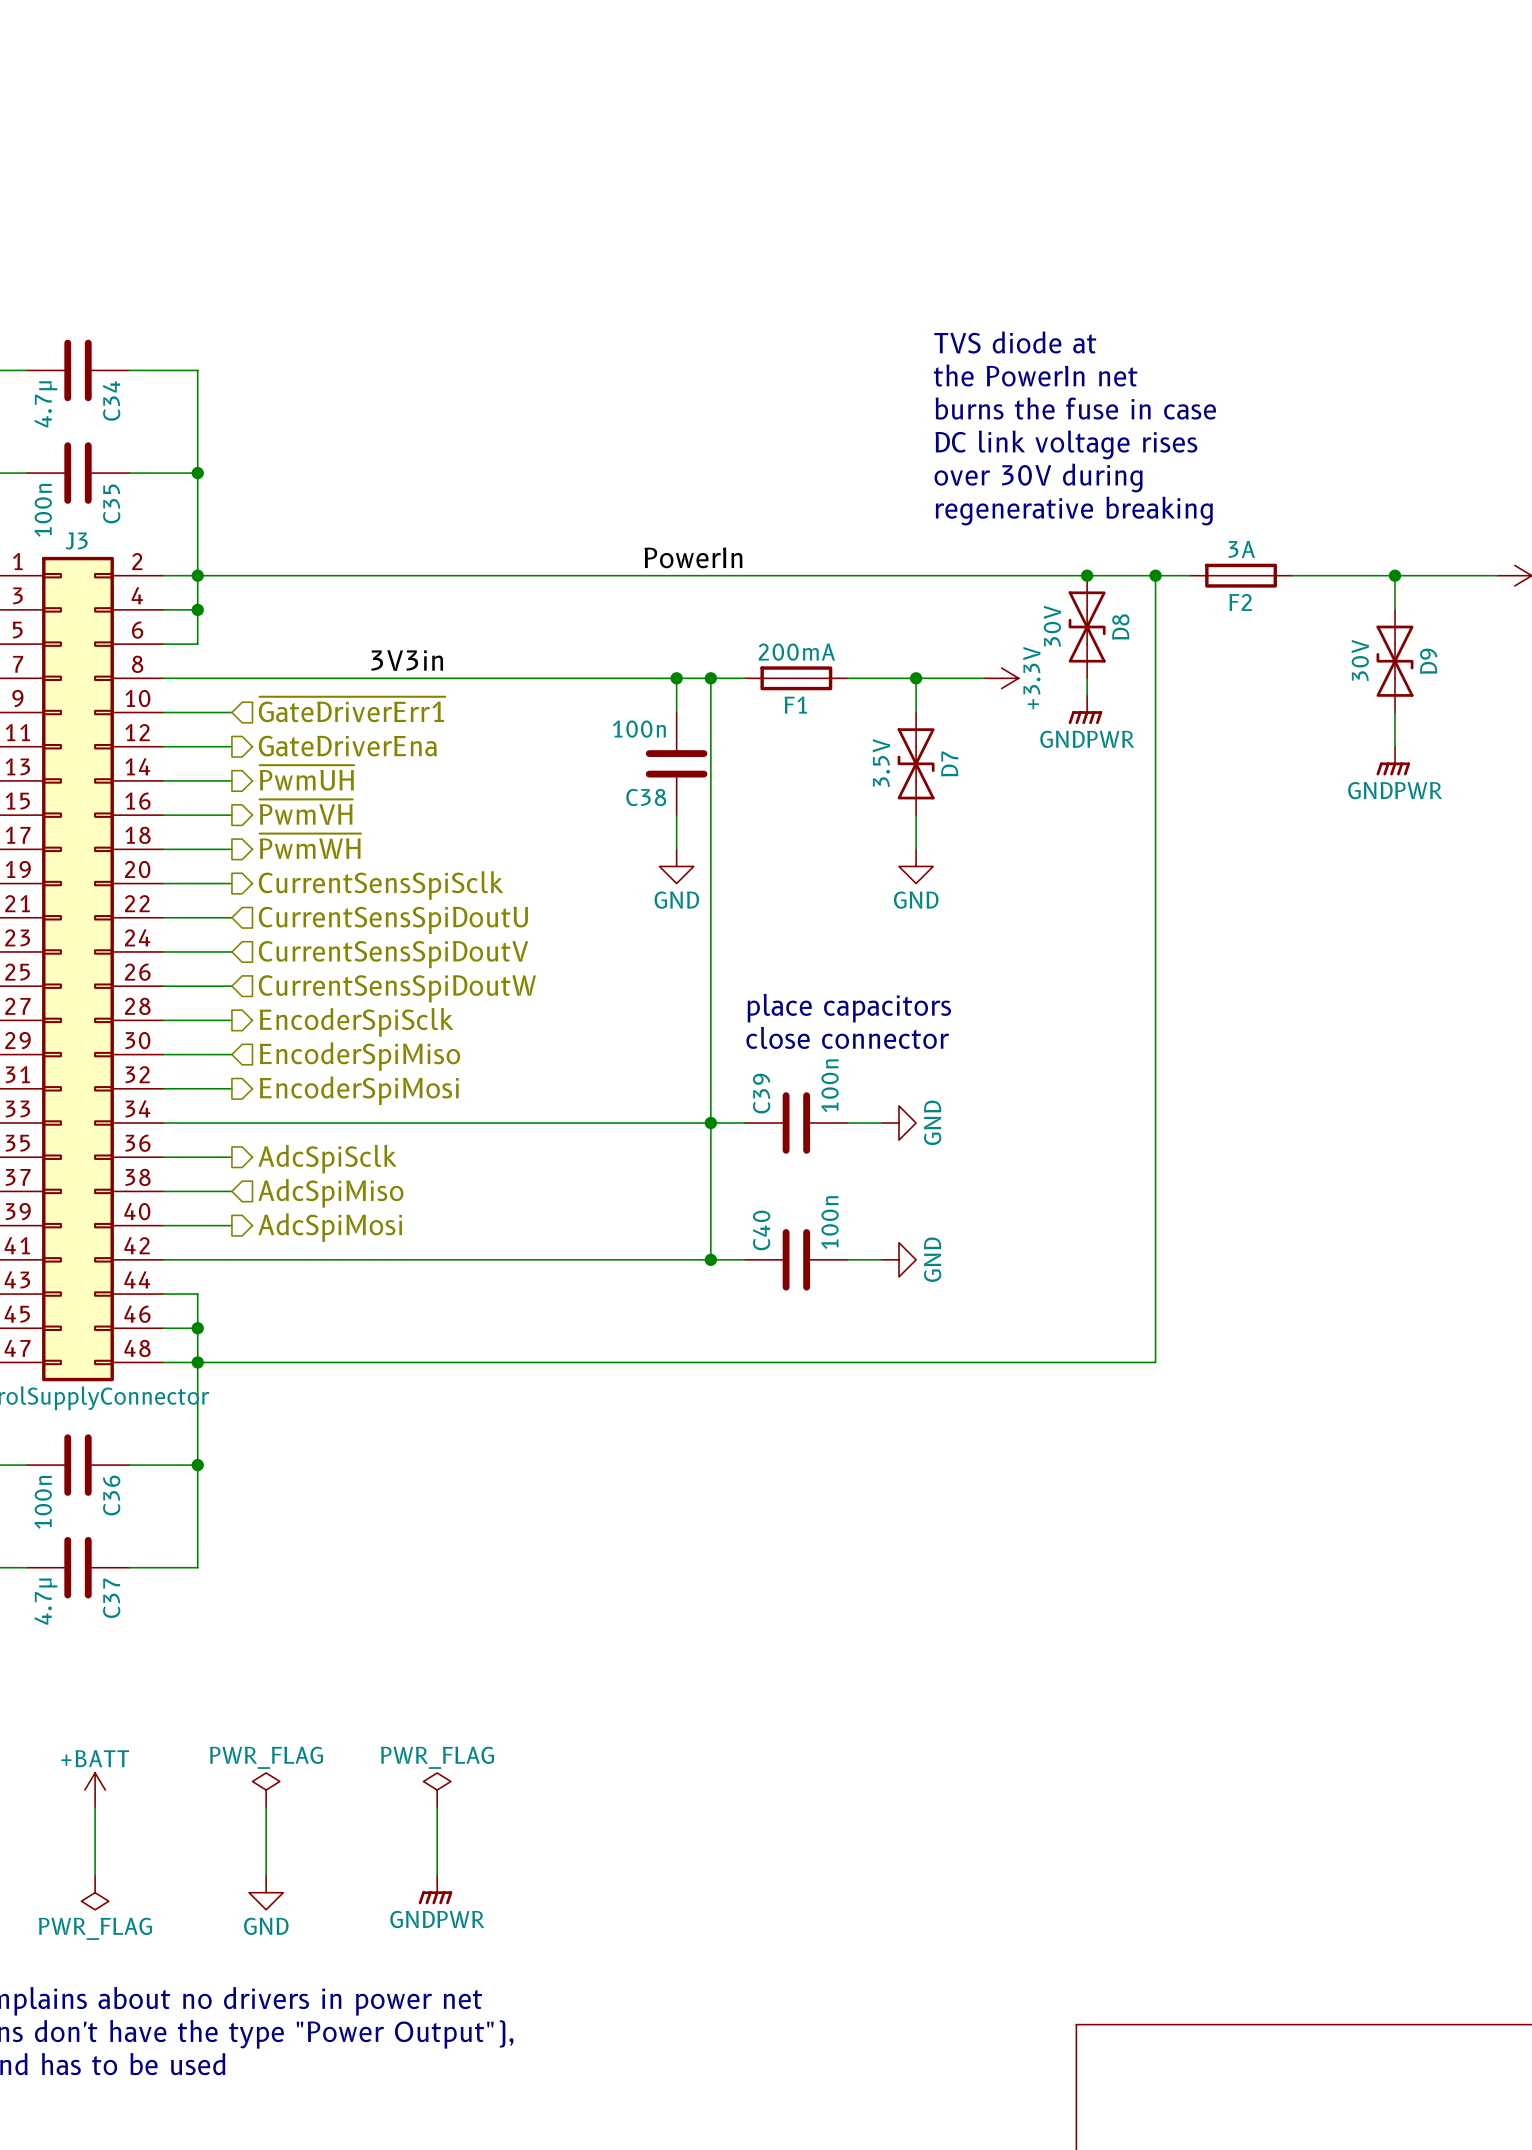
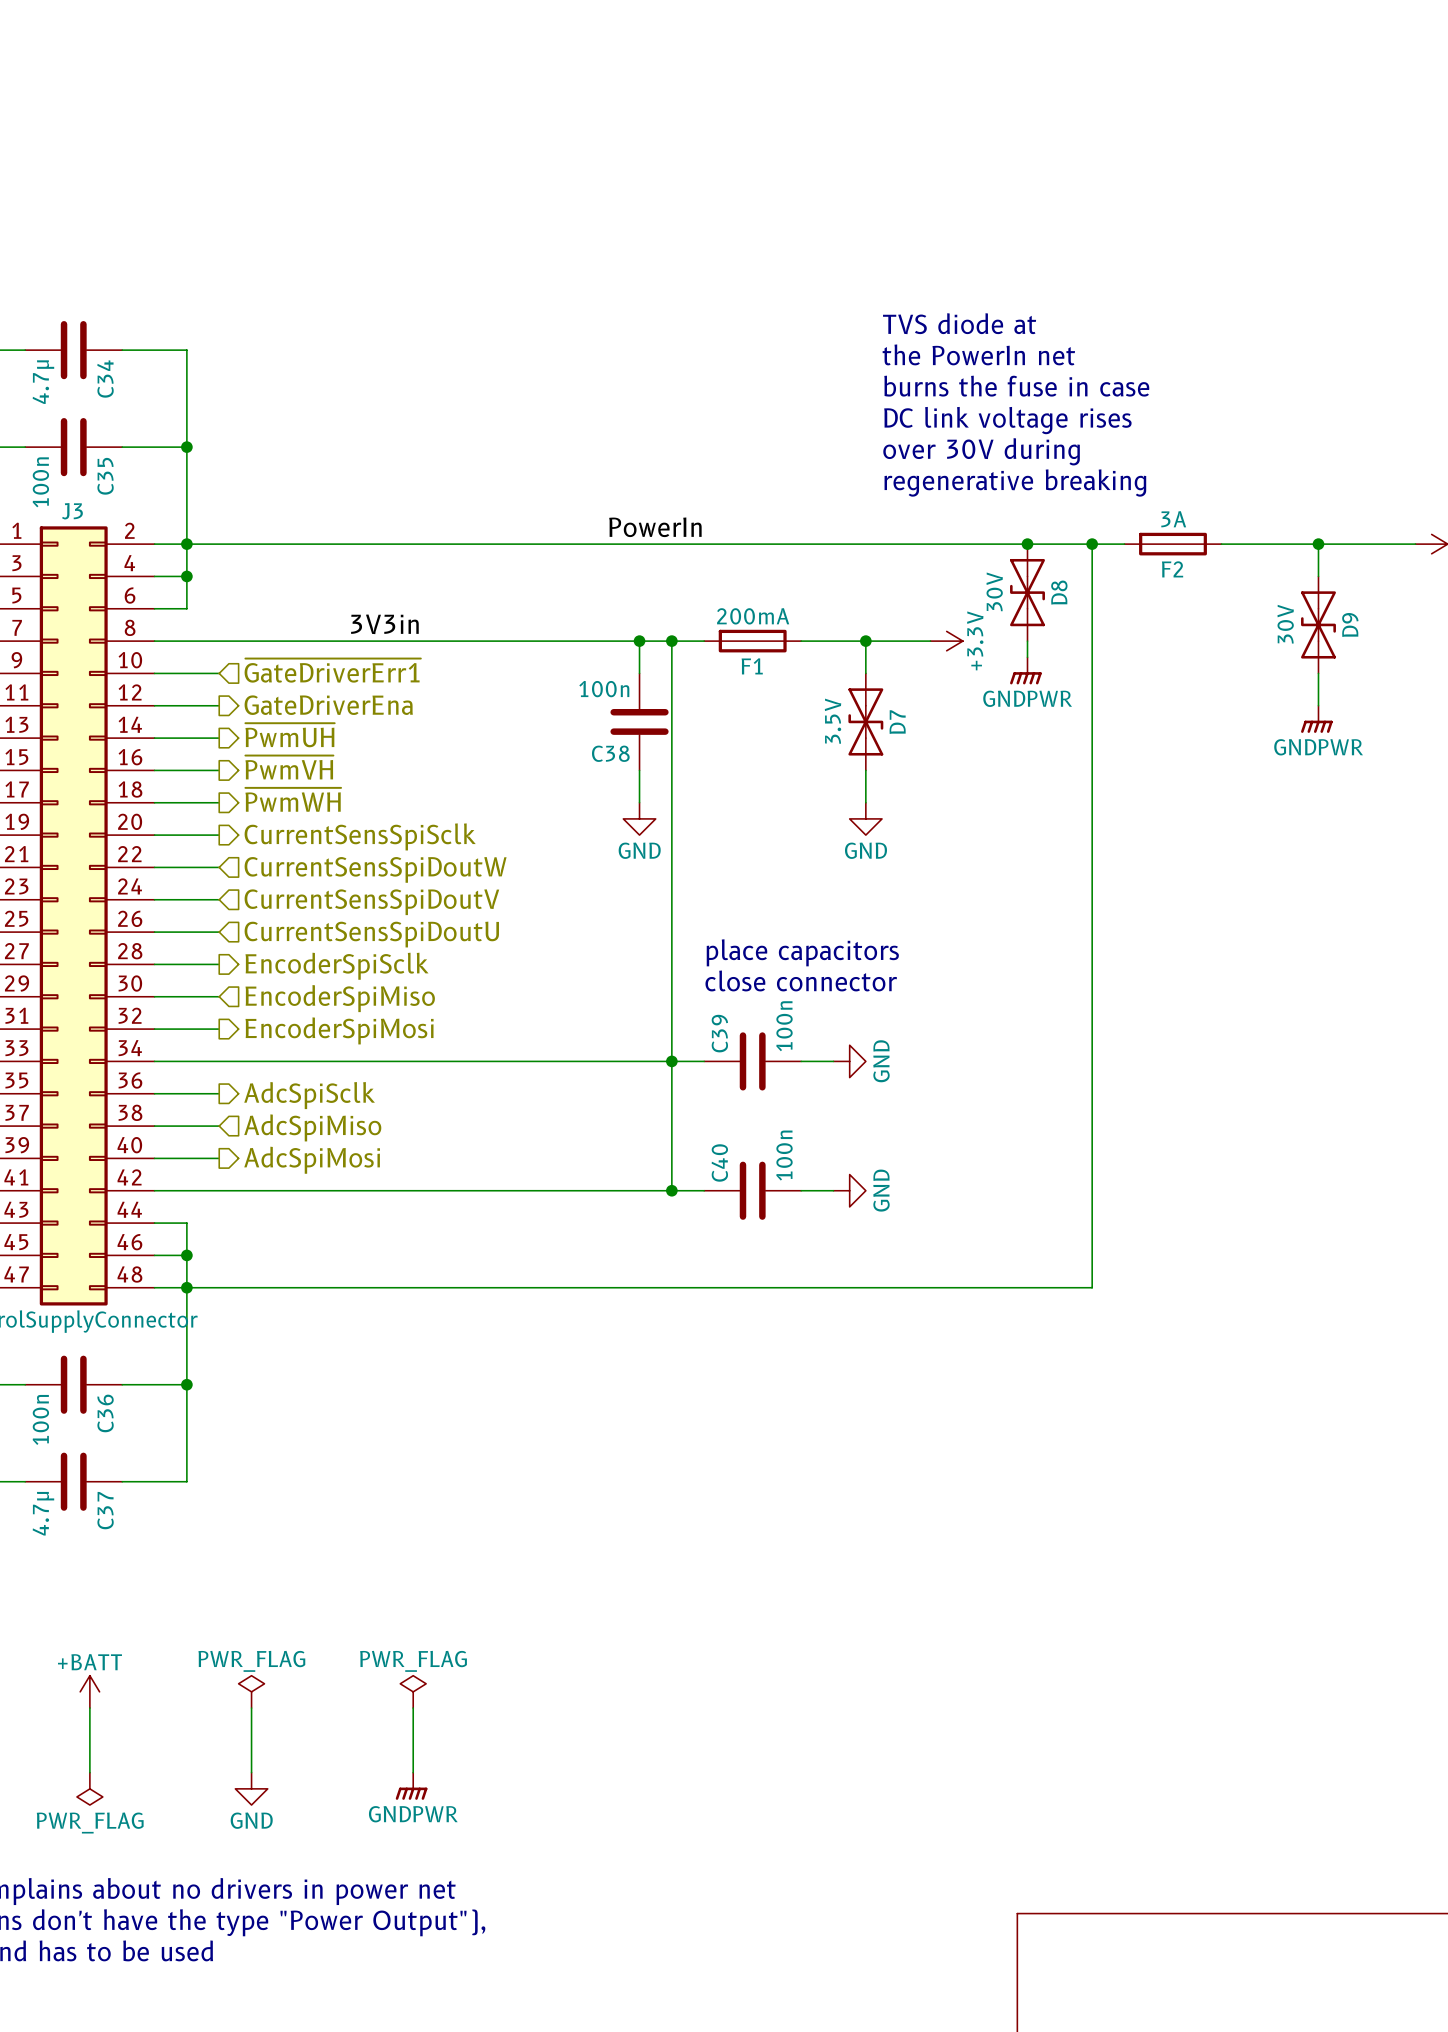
hierarchical label: CurrentSensSpiDoutU (393, 920) -> CurrentSensSpiDoutW (375, 869)
hierarchical label: CurrentSensSpiDoutW (397, 988) -> CurrentSensSpiDoutU (371, 934)

